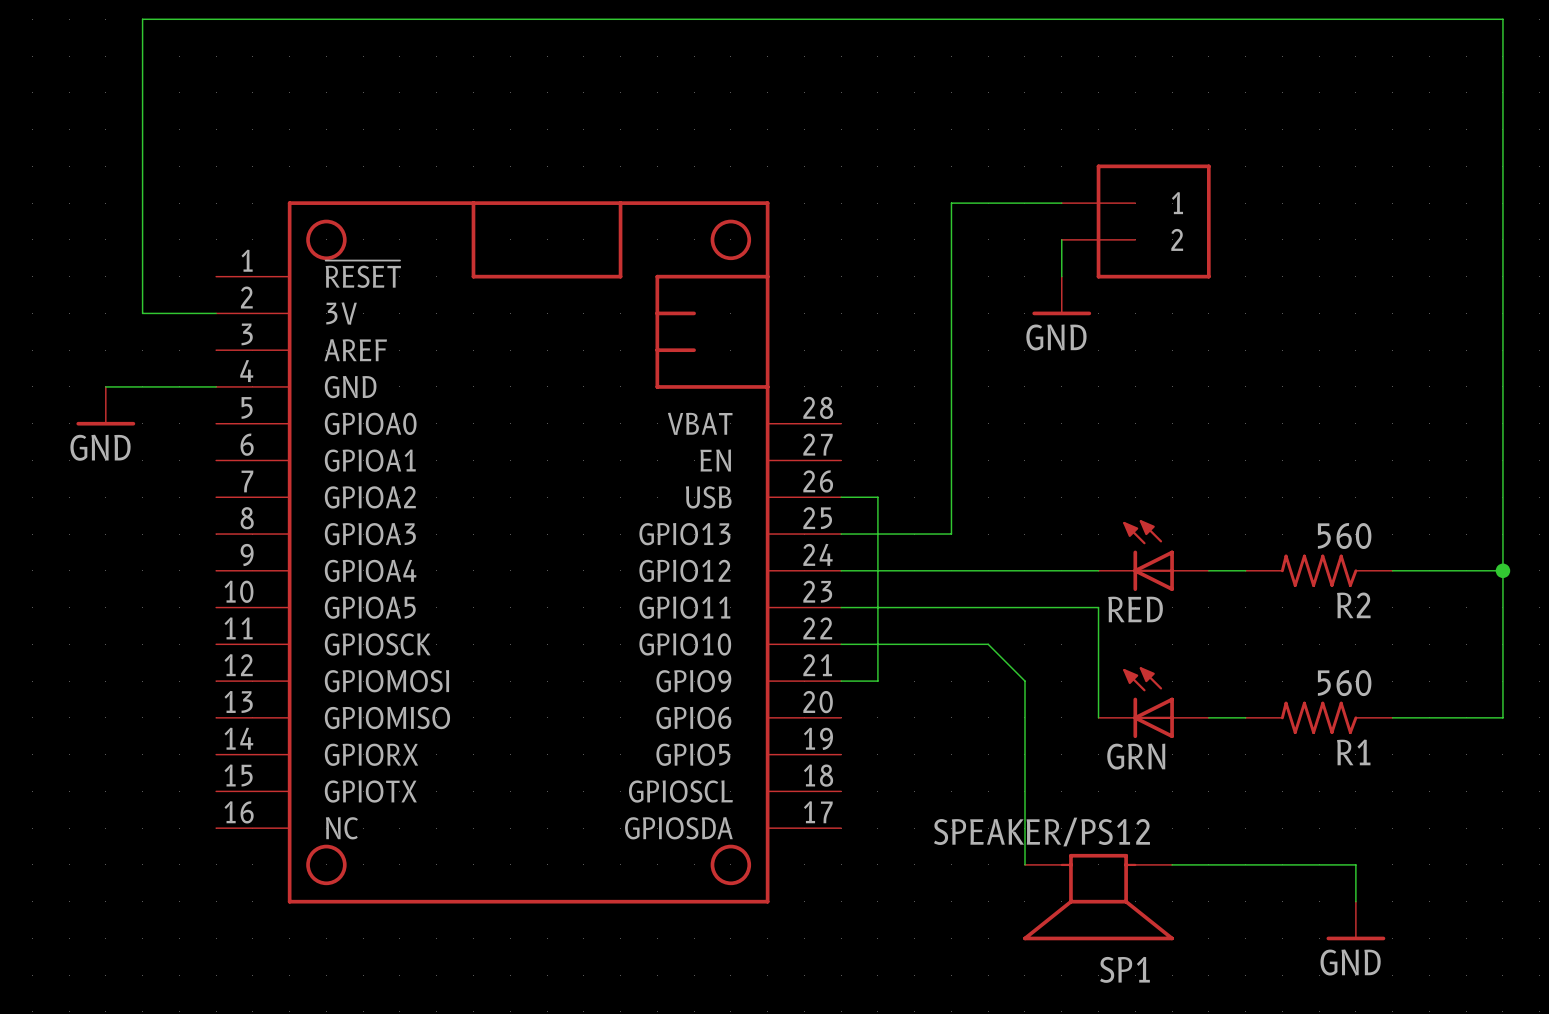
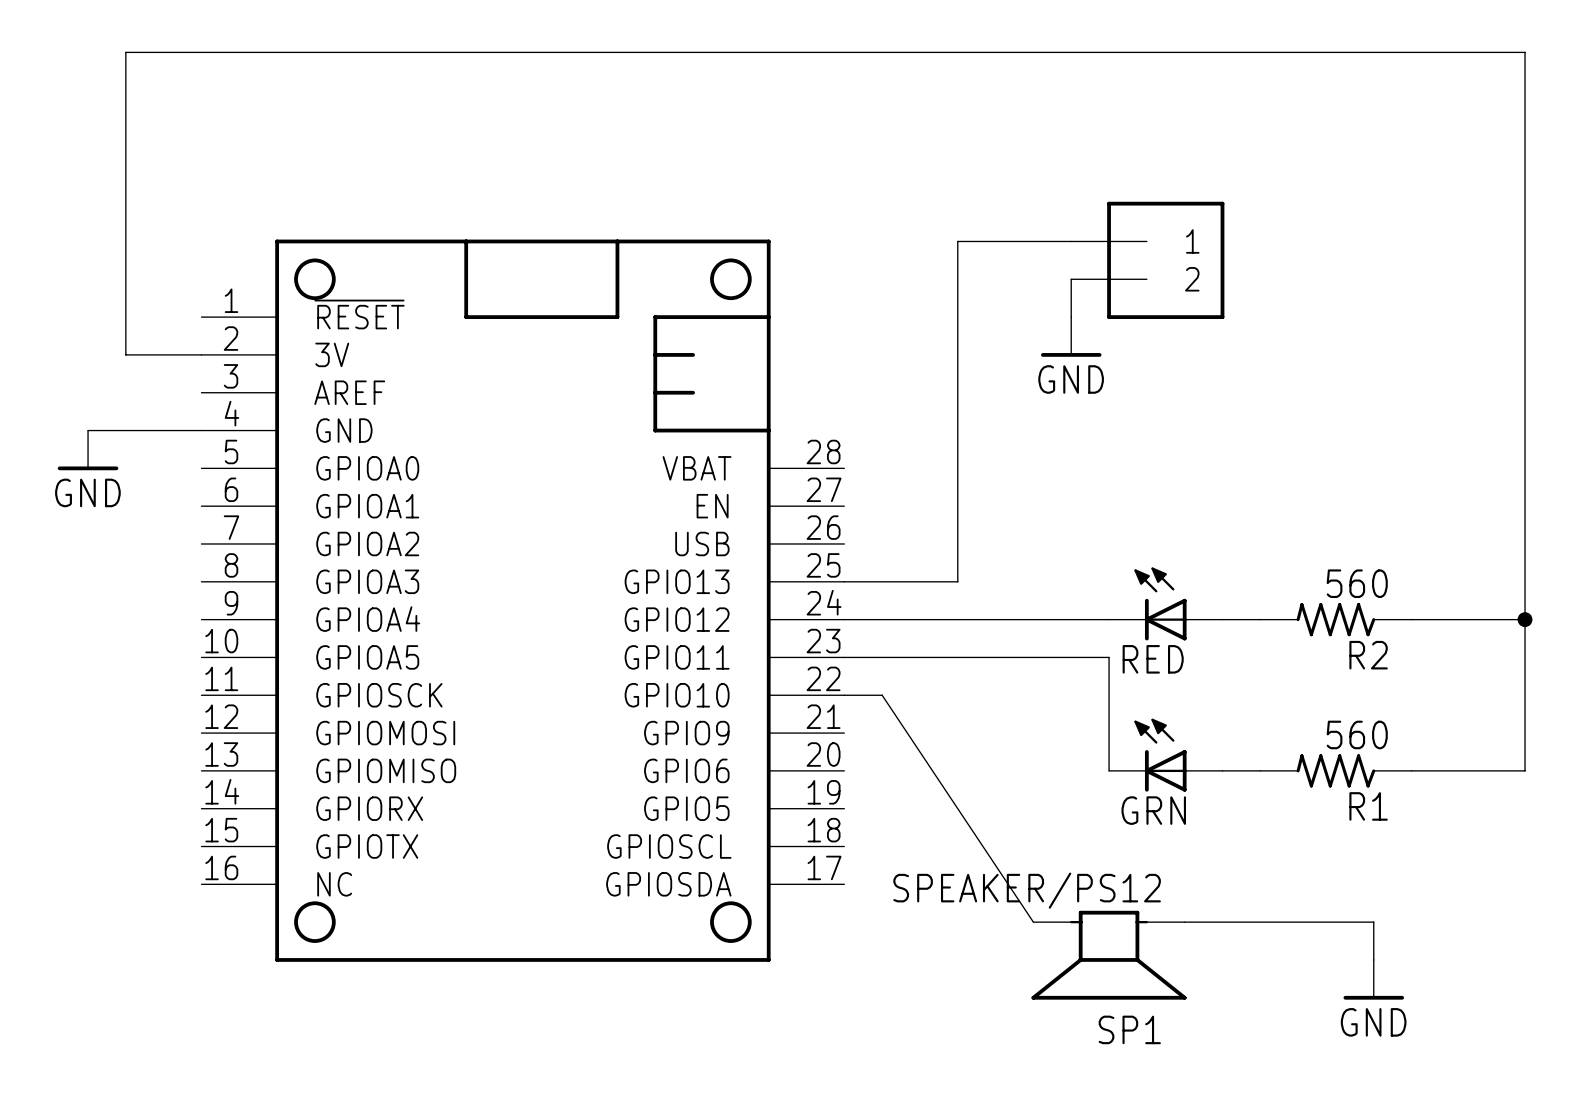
wire: (841, 497) (877, 497) (877, 681) (841, 681) -> none
wire: (877, 644) (988, 644) (1024, 681) (1024, 864) -> (882, 695) (1033, 922)

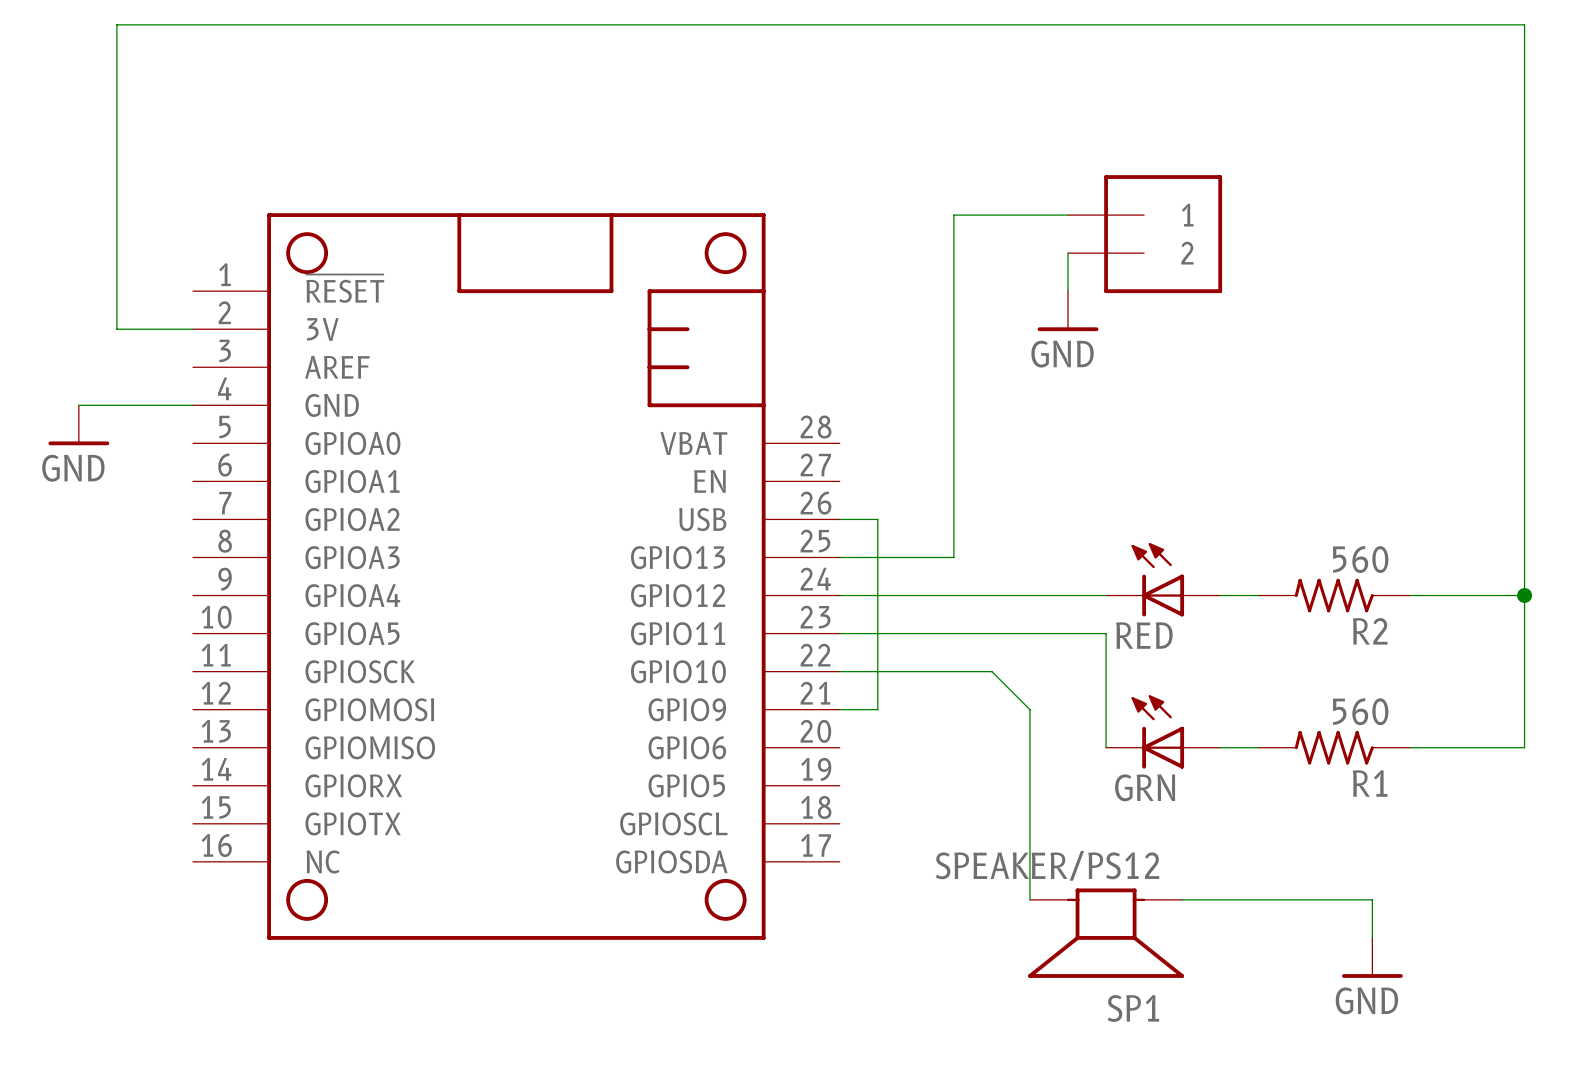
wire: none -> (839, 519) (877, 519) (877, 709) (839, 709)
wire: (882, 695) (1033, 922) -> (877, 671) (991, 671) (1029, 709) (1029, 899)

